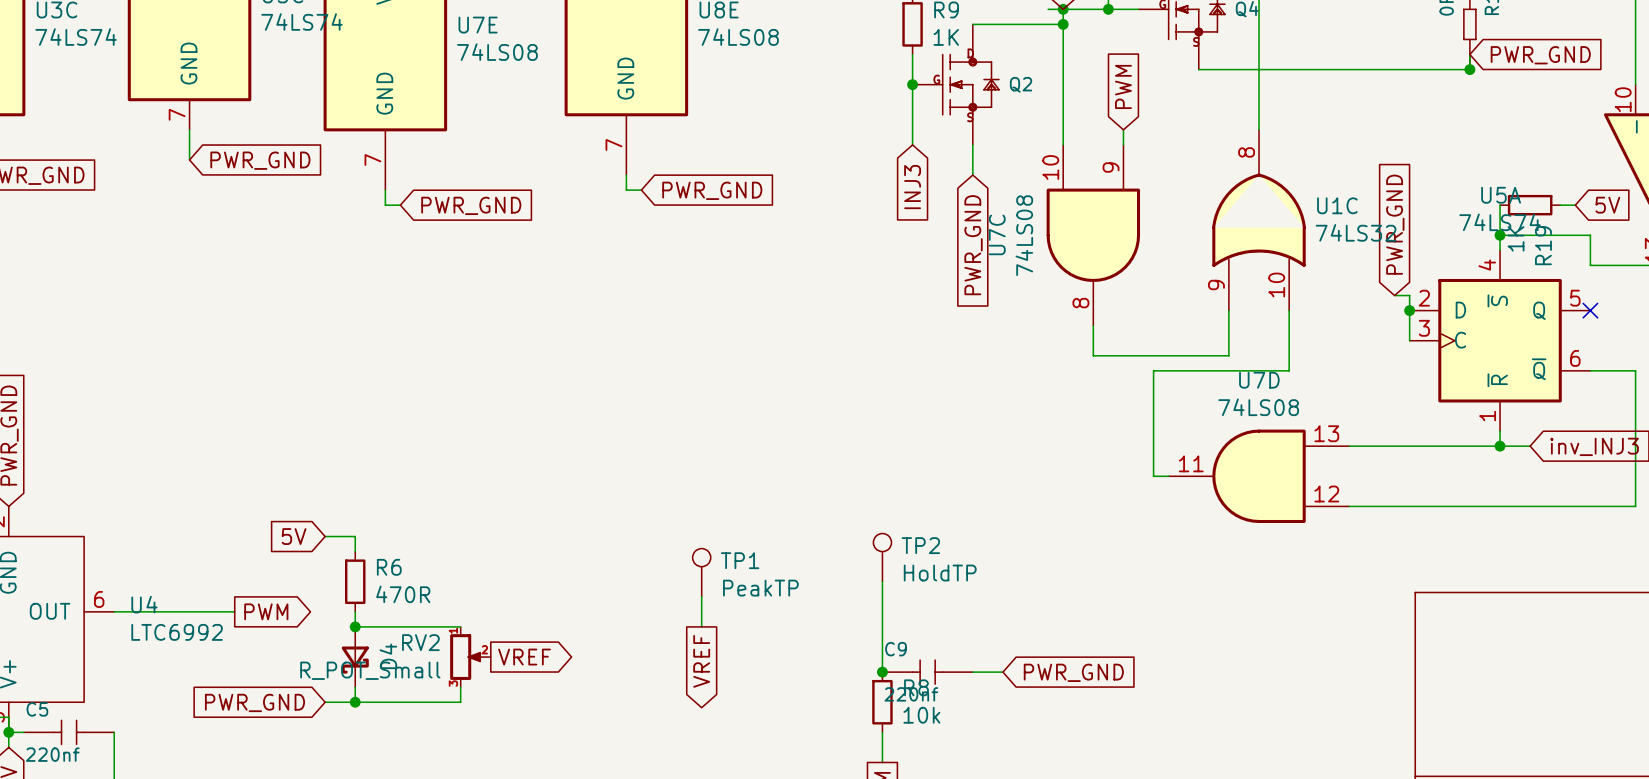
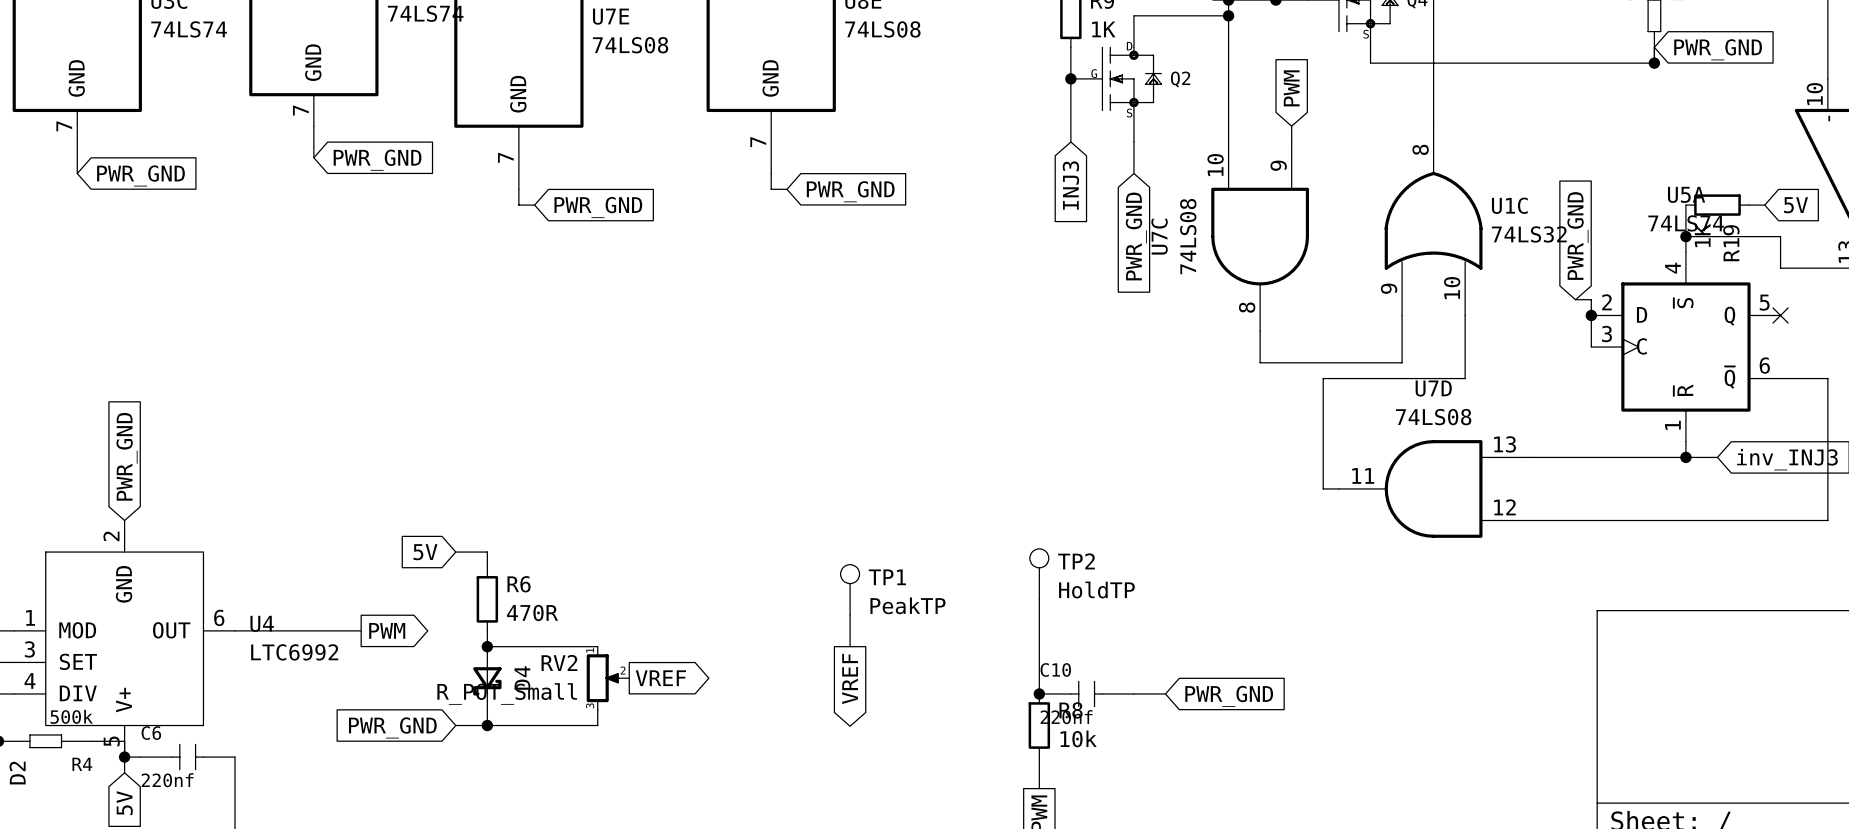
C9 name: C9 (895, 649) -> C10 (1055, 669)
C5 name: C5 (37, 709) -> C6 (151, 733)

